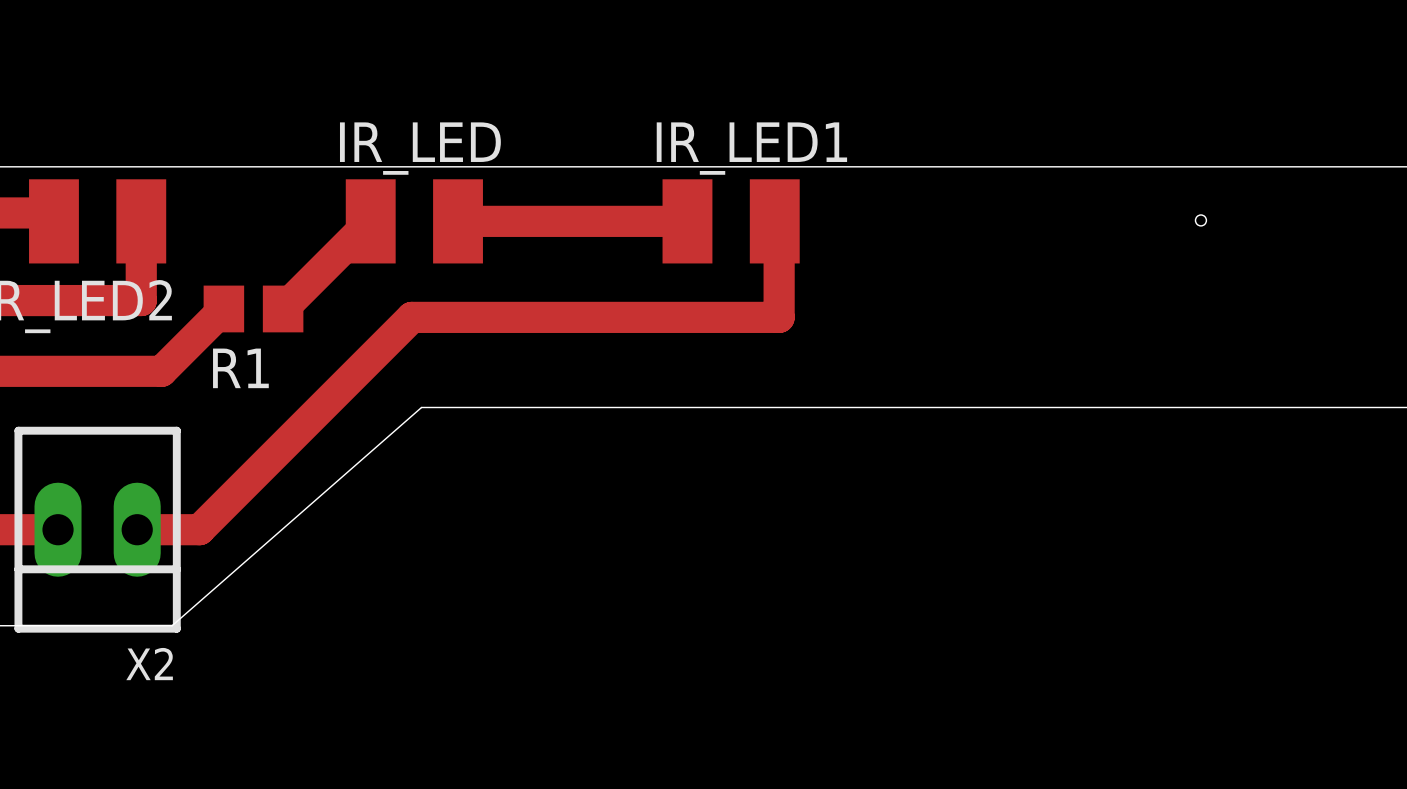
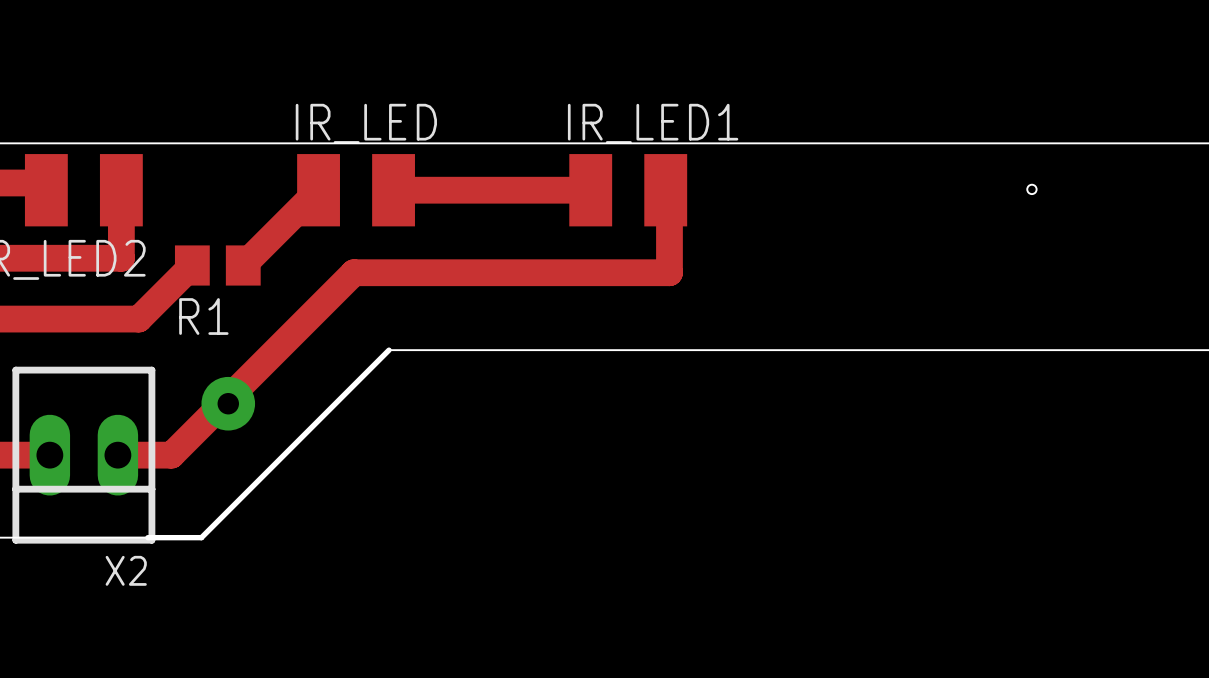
board edge: (452, 407) (421, 407) (172, 625) -> (389, 350) (201, 537) (147, 537)
via: none -> (228, 403)

